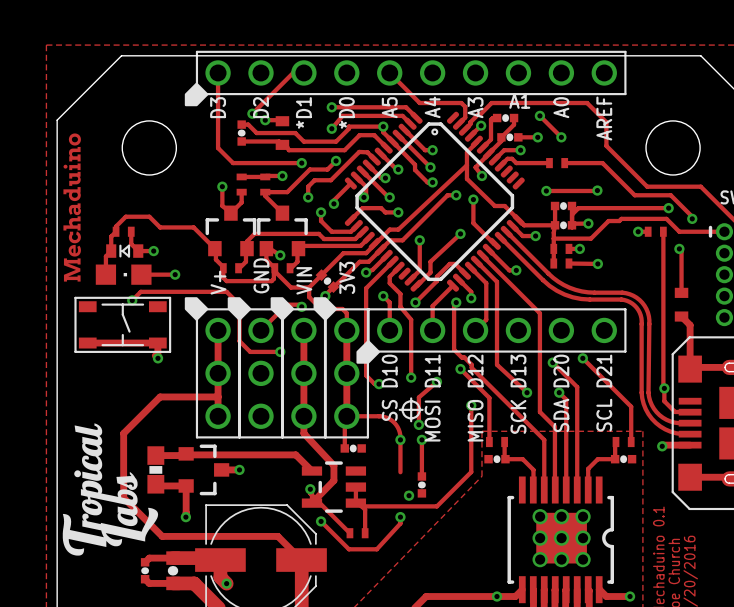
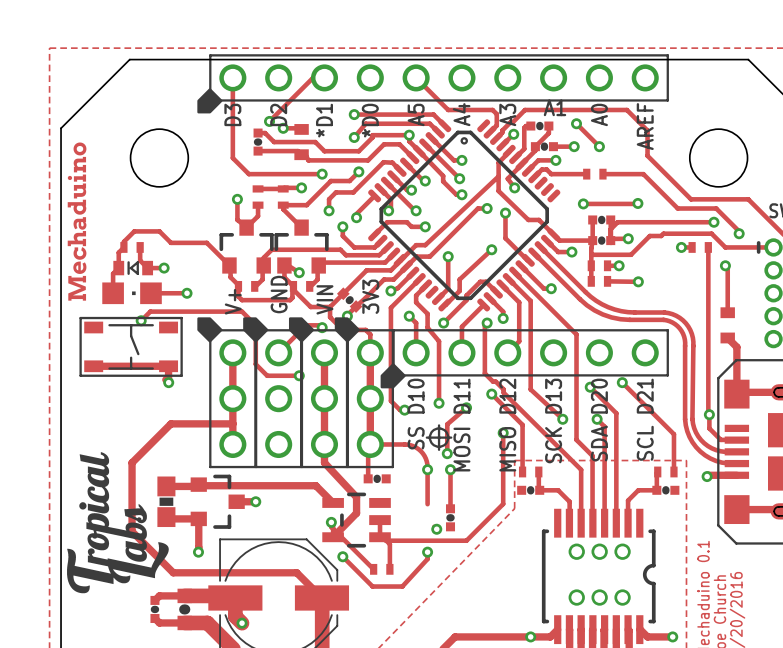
part footprint: [507, 476, 614, 604] -> [541, 508, 656, 645]
via: (540, 538) -> none
via: (561, 538) -> none
via: (583, 538) -> none

